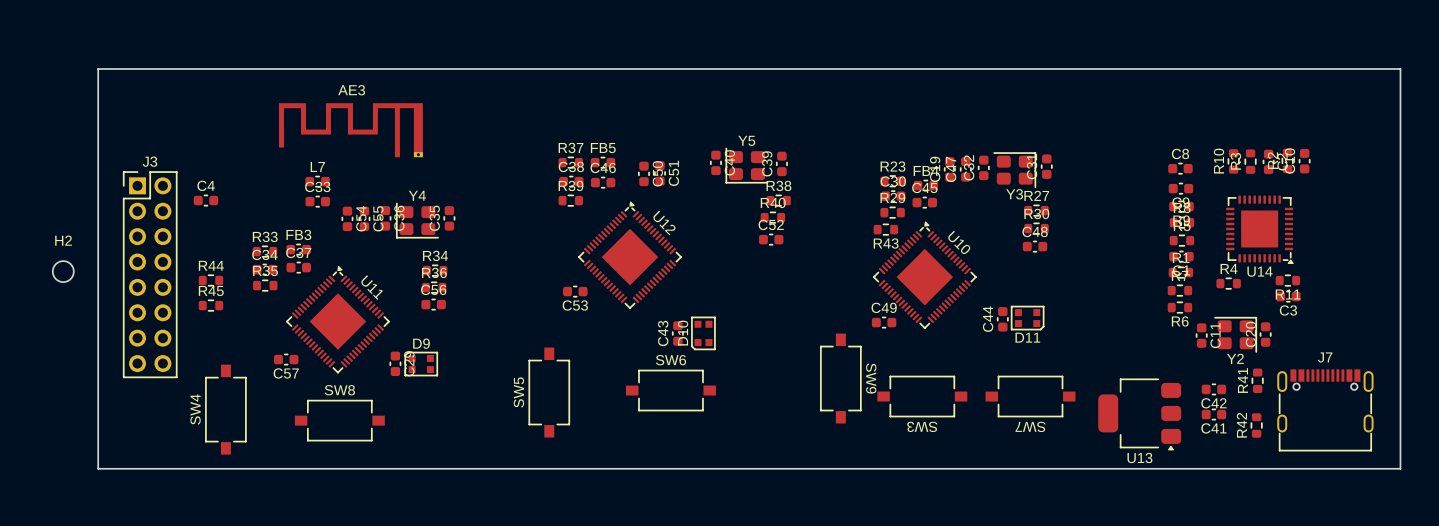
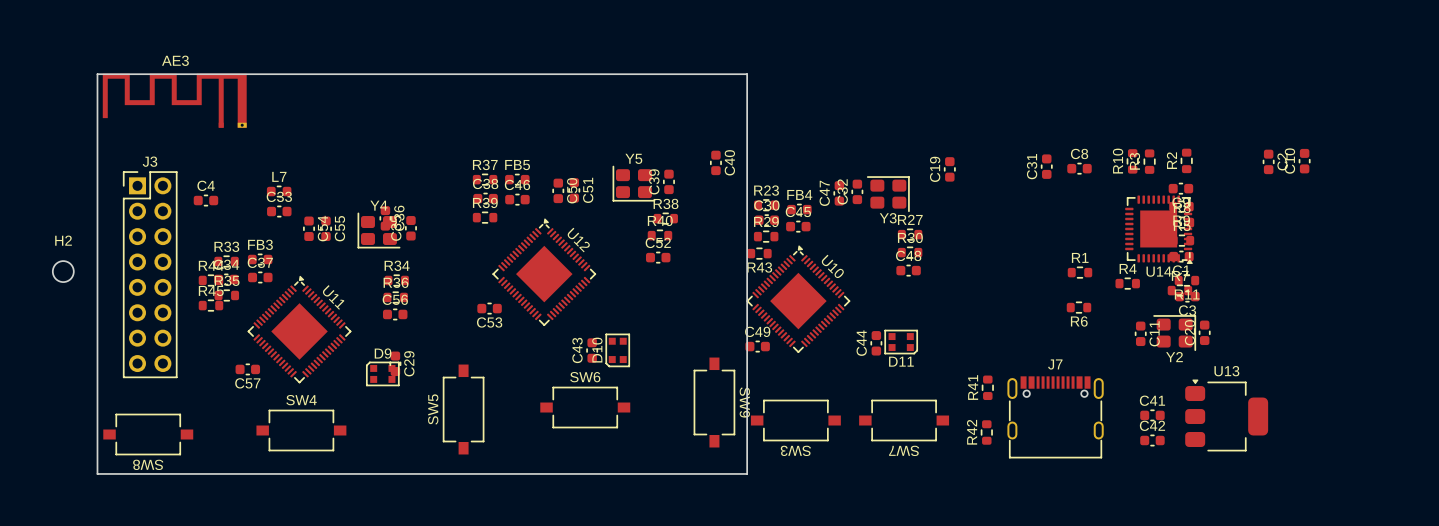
board edge: (98, 69) (1400, 69) (1400, 468) (98, 468) (98, 69) -> none
board edge: none -> (97, 74) (747, 74) (747, 473) (97, 473) (97, 74)
AE3 position: (350, 130) -> (174, 100)
R2 position: (1287, 160) -> (1186, 160)
R10 position: (1233, 161) -> (1132, 161)
R3 position: (1250, 161) -> (1149, 161)
R37 position: (570, 162) -> (485, 179)
FB5 position: (603, 162) -> (517, 179)
C39 position: (781, 163) -> (668, 181)
Y5 position: (746, 165) -> (633, 183)
C32 position: (983, 167) -> (857, 191)
C8 position: (1180, 168) -> (1079, 168)
C47 position: (965, 169) -> (839, 193)
Y3 position: (1014, 170) -> (888, 194)
C50 position: (643, 173) -> (558, 190)
C51 position: (659, 173) -> (574, 190)
L7 position: (317, 181) -> (279, 191)
C38 position: (571, 181) -> (485, 198)
R23 position: (892, 181) -> (766, 205)
C46 position: (603, 182) -> (517, 199)
FB4 position: (925, 185) -> (799, 209)
C30 position: (893, 196) -> (766, 220)
R39 position: (570, 200) -> (485, 217)
R38 position: (778, 200) -> (665, 218)
C33 position: (317, 201) -> (279, 211)
C45 position: (924, 202) -> (798, 226)
R27 position: (1036, 210) -> (910, 234)
R29 position: (892, 212) -> (766, 236)
R40 position: (772, 217) -> (659, 235)
C54 position: (347, 218) -> (309, 228)
C55 position: (364, 218) -> (326, 228)
C35 position: (449, 218) -> (410, 228)
Y4 position: (417, 220) -> (378, 230)
R30 position: (1036, 228) -> (910, 252)
R43 position: (885, 229) -> (759, 253)
U14 position: (1259, 229) -> (1159, 229)
C52 position: (771, 239) -> (658, 257)
C48 position: (1035, 246) -> (908, 270)
FB3 position: (298, 249) -> (260, 259)
R33 position: (264, 251) -> (226, 261)
U12 position: (629, 255) -> (544, 272)
C37 position: (298, 267) -> (260, 277)
C34 position: (264, 269) -> (226, 279)
R34 position: (435, 270) -> (396, 280)
R1 position: (1180, 272) -> (1079, 272)
U10 position: (924, 275) -> (798, 299)
R11 position: (1287, 280) -> (1186, 280)
R4 position: (1228, 283) -> (1127, 283)
R35 position: (265, 285) -> (226, 295)
R36 position: (434, 287) -> (395, 297)
C53 position: (575, 291) -> (489, 308)
C3 position: (1288, 296) -> (1187, 296)
C56 position: (433, 304) -> (395, 314)
R6 position: (1179, 307) -> (1078, 307)
D11 position: (1027, 318) -> (901, 342)
U11 position: (337, 319) -> (299, 329)
C44 position: (1002, 319) -> (876, 343)
C49 position: (884, 322) -> (757, 346)
C43 position: (677, 333) -> (592, 350)
D10 position: (703, 333) -> (617, 350)
Y2 position: (1235, 334) -> (1174, 333)
C20 position: (1265, 334) -> (1204, 332)
C11 position: (1201, 335) -> (1140, 333)
C57 position: (286, 359) -> (247, 369)
D9 position: (421, 364) -> (382, 373)
SW9 position: (840, 378) -> (714, 402)
R41 position: (1257, 380) -> (987, 387)
C42 position: (1213, 389) -> (1152, 440)
SW8 name rotation: 0° (339, 390) -> 180° (148, 464)
SW8 name position: SW8 (339, 390) -> SW8 (148, 464)
SW6 position: (670, 390) -> (585, 407)
SW5 position: (549, 392) -> (463, 409)
SW3 position: (922, 396) -> (795, 420)
SW7 position: (1030, 396) -> (904, 420)
C42 name position: C42 (1213, 403) -> C42 (1152, 425)
SW4 rotation: 0° (225, 409) -> 90° clockwise (301, 430)
SW4 position: (225, 409) -> (301, 430)
J7 position: (1325, 410) -> (1055, 417)
U13 rotation: 0° (1139, 414) -> 180° (1226, 415)
U13 position: (1139, 414) -> (1226, 415)
C41 position: (1213, 414) -> (1152, 415)
SW8 position: (339, 420) -> (148, 434)
R42 position: (1256, 425) -> (986, 432)
C41 name position: C41 (1213, 428) -> C41 (1152, 400)

